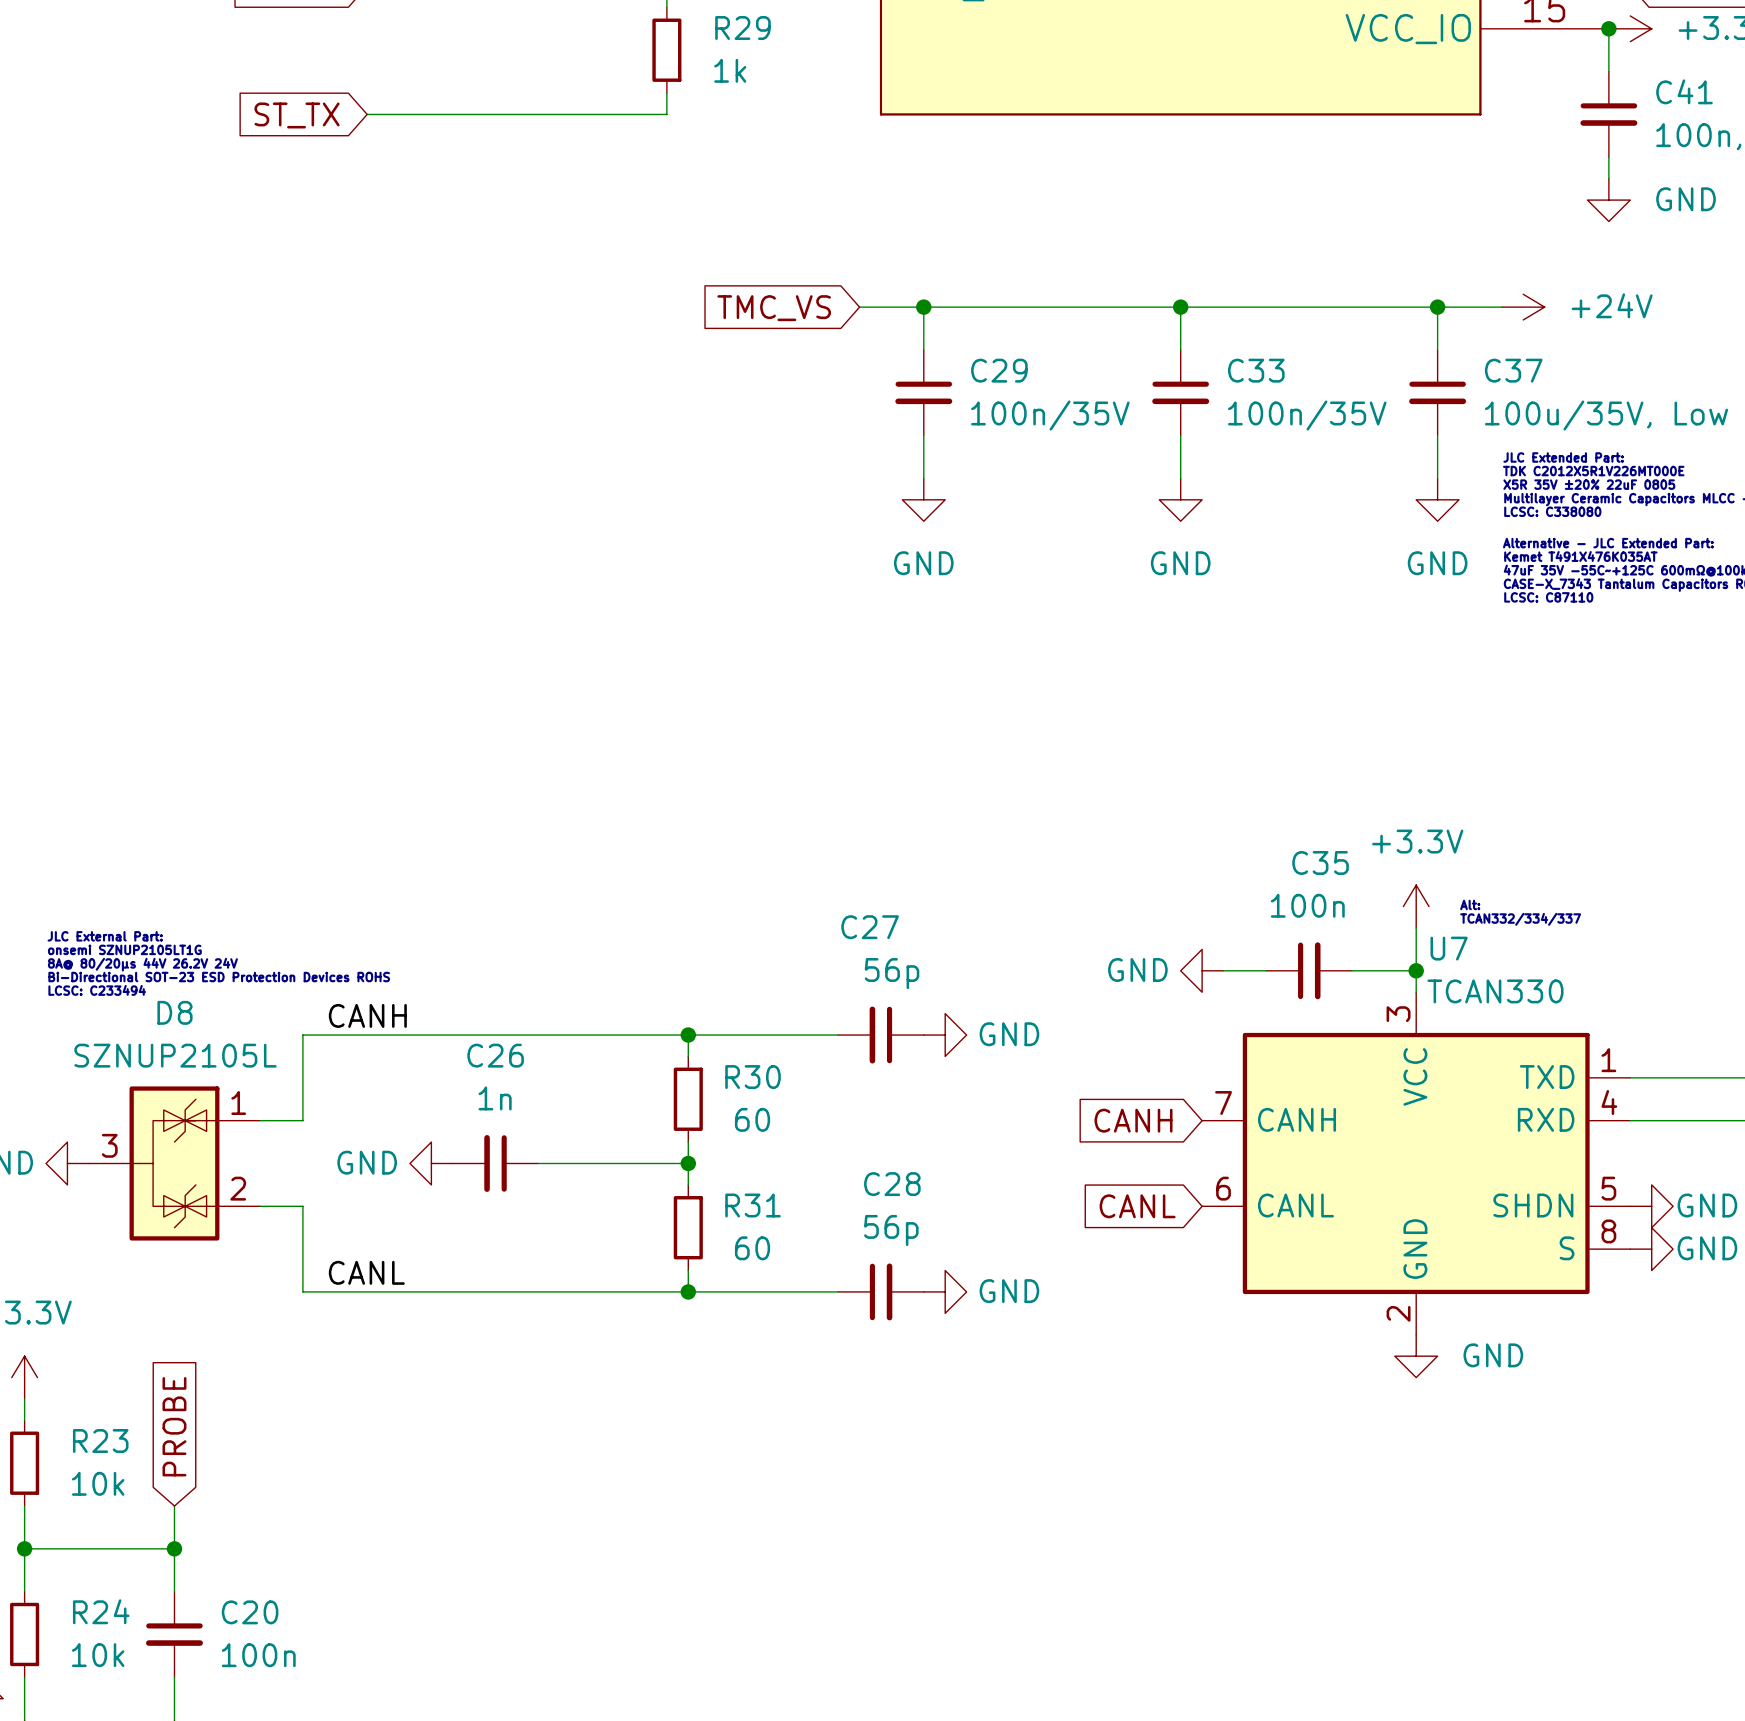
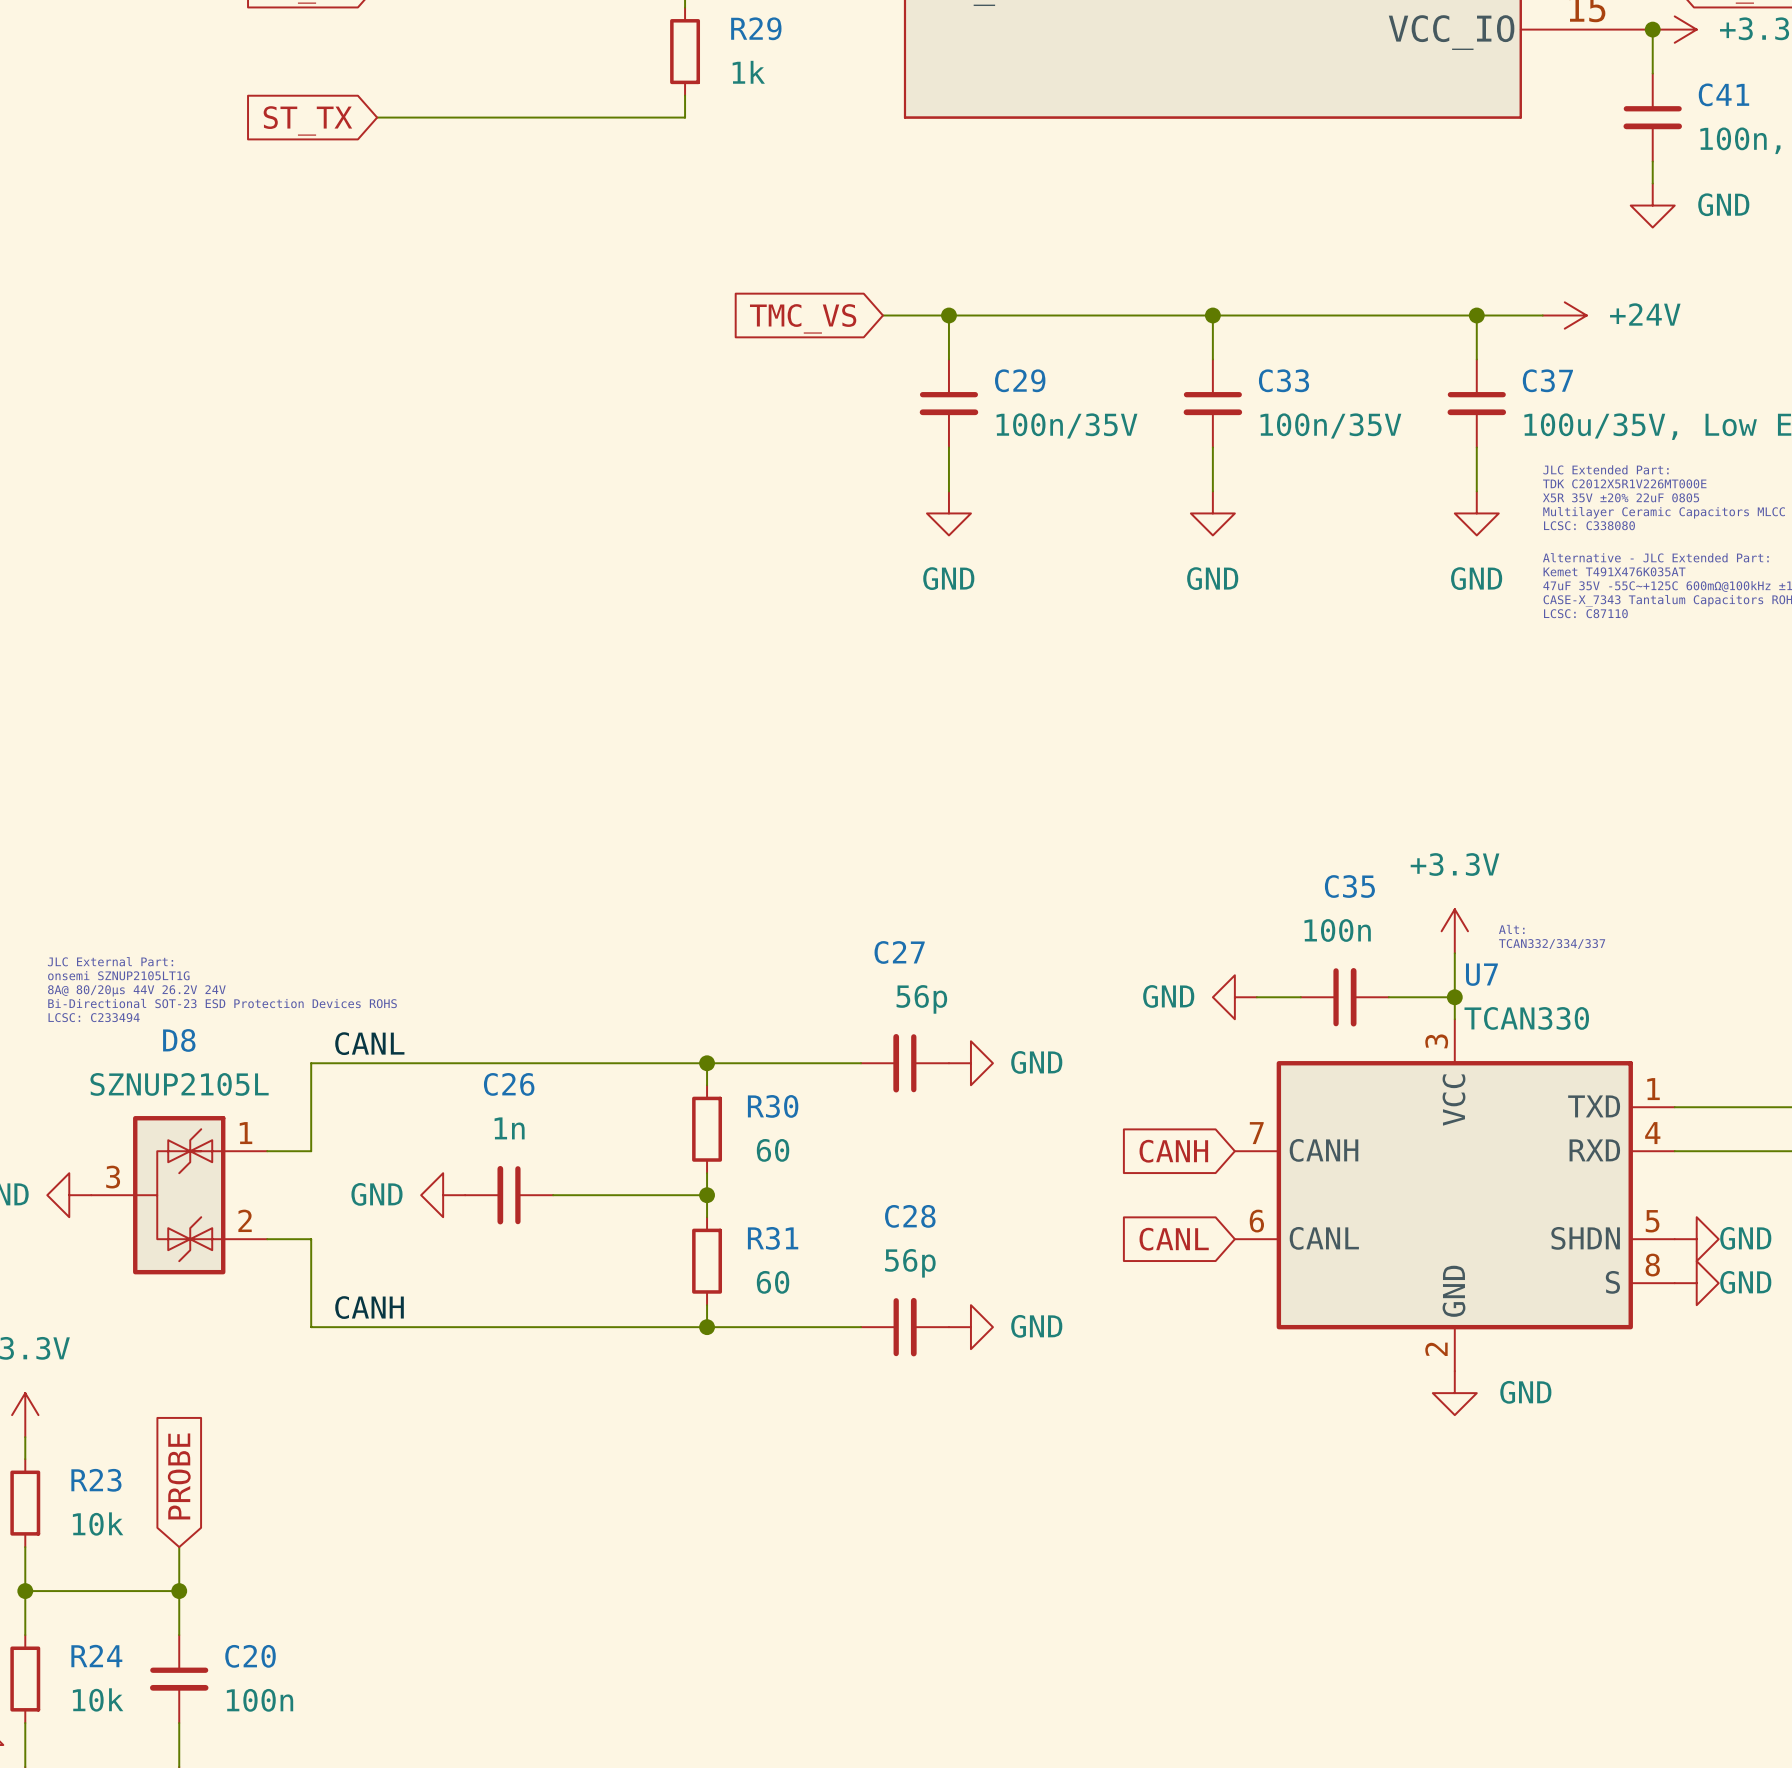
label: CANH (367, 1015) -> CANL (369, 1043)
label: CANL (366, 1272) -> CANH (369, 1307)

